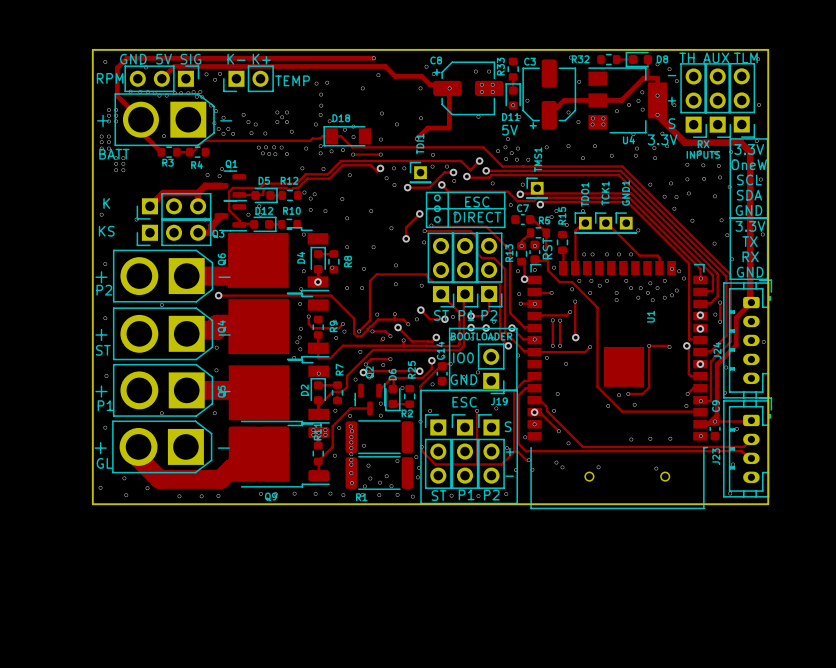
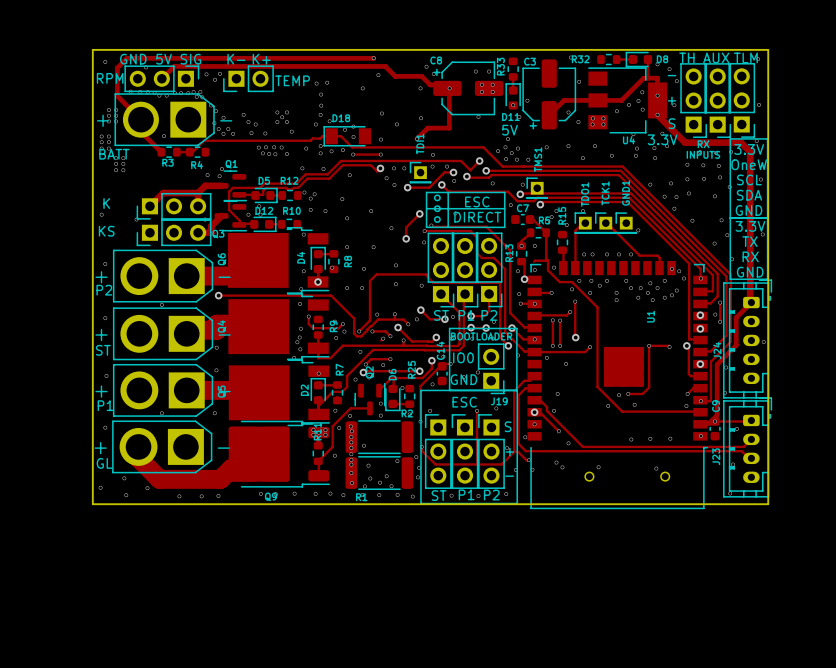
text: RST (547, 248) -> none
part: (534, 252) -> none

